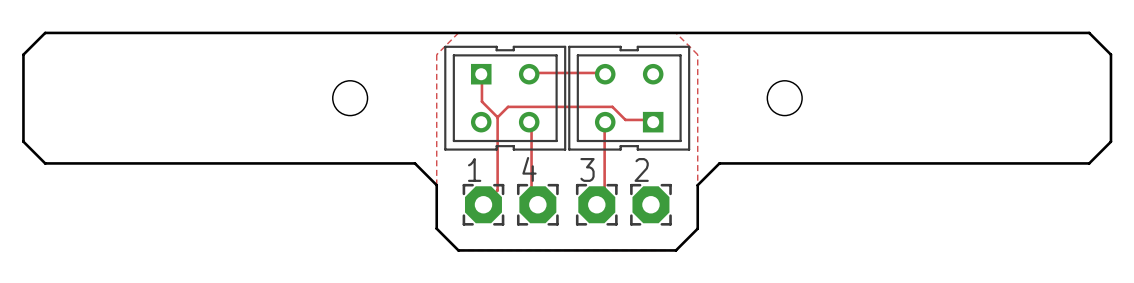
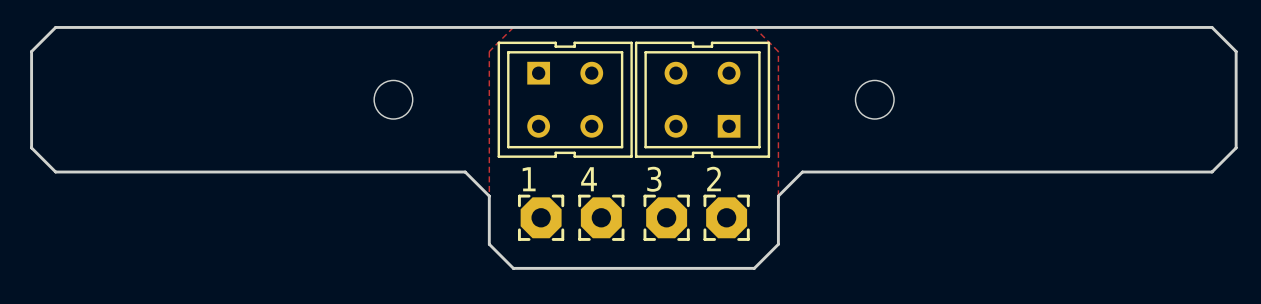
track: (481, 74) (481, 101) (497, 117) -> none
track: (529, 74) (605, 74) -> none
track: (497, 117) (497, 190) (483, 204) -> none
track: (497, 117) (508, 106) (612, 106) (625, 119) (651, 119) (653, 122) -> none
track: (529, 122) (531, 122) (531, 198) (537, 204) -> none
track: (605, 122) (604, 195) (596, 204) -> none

